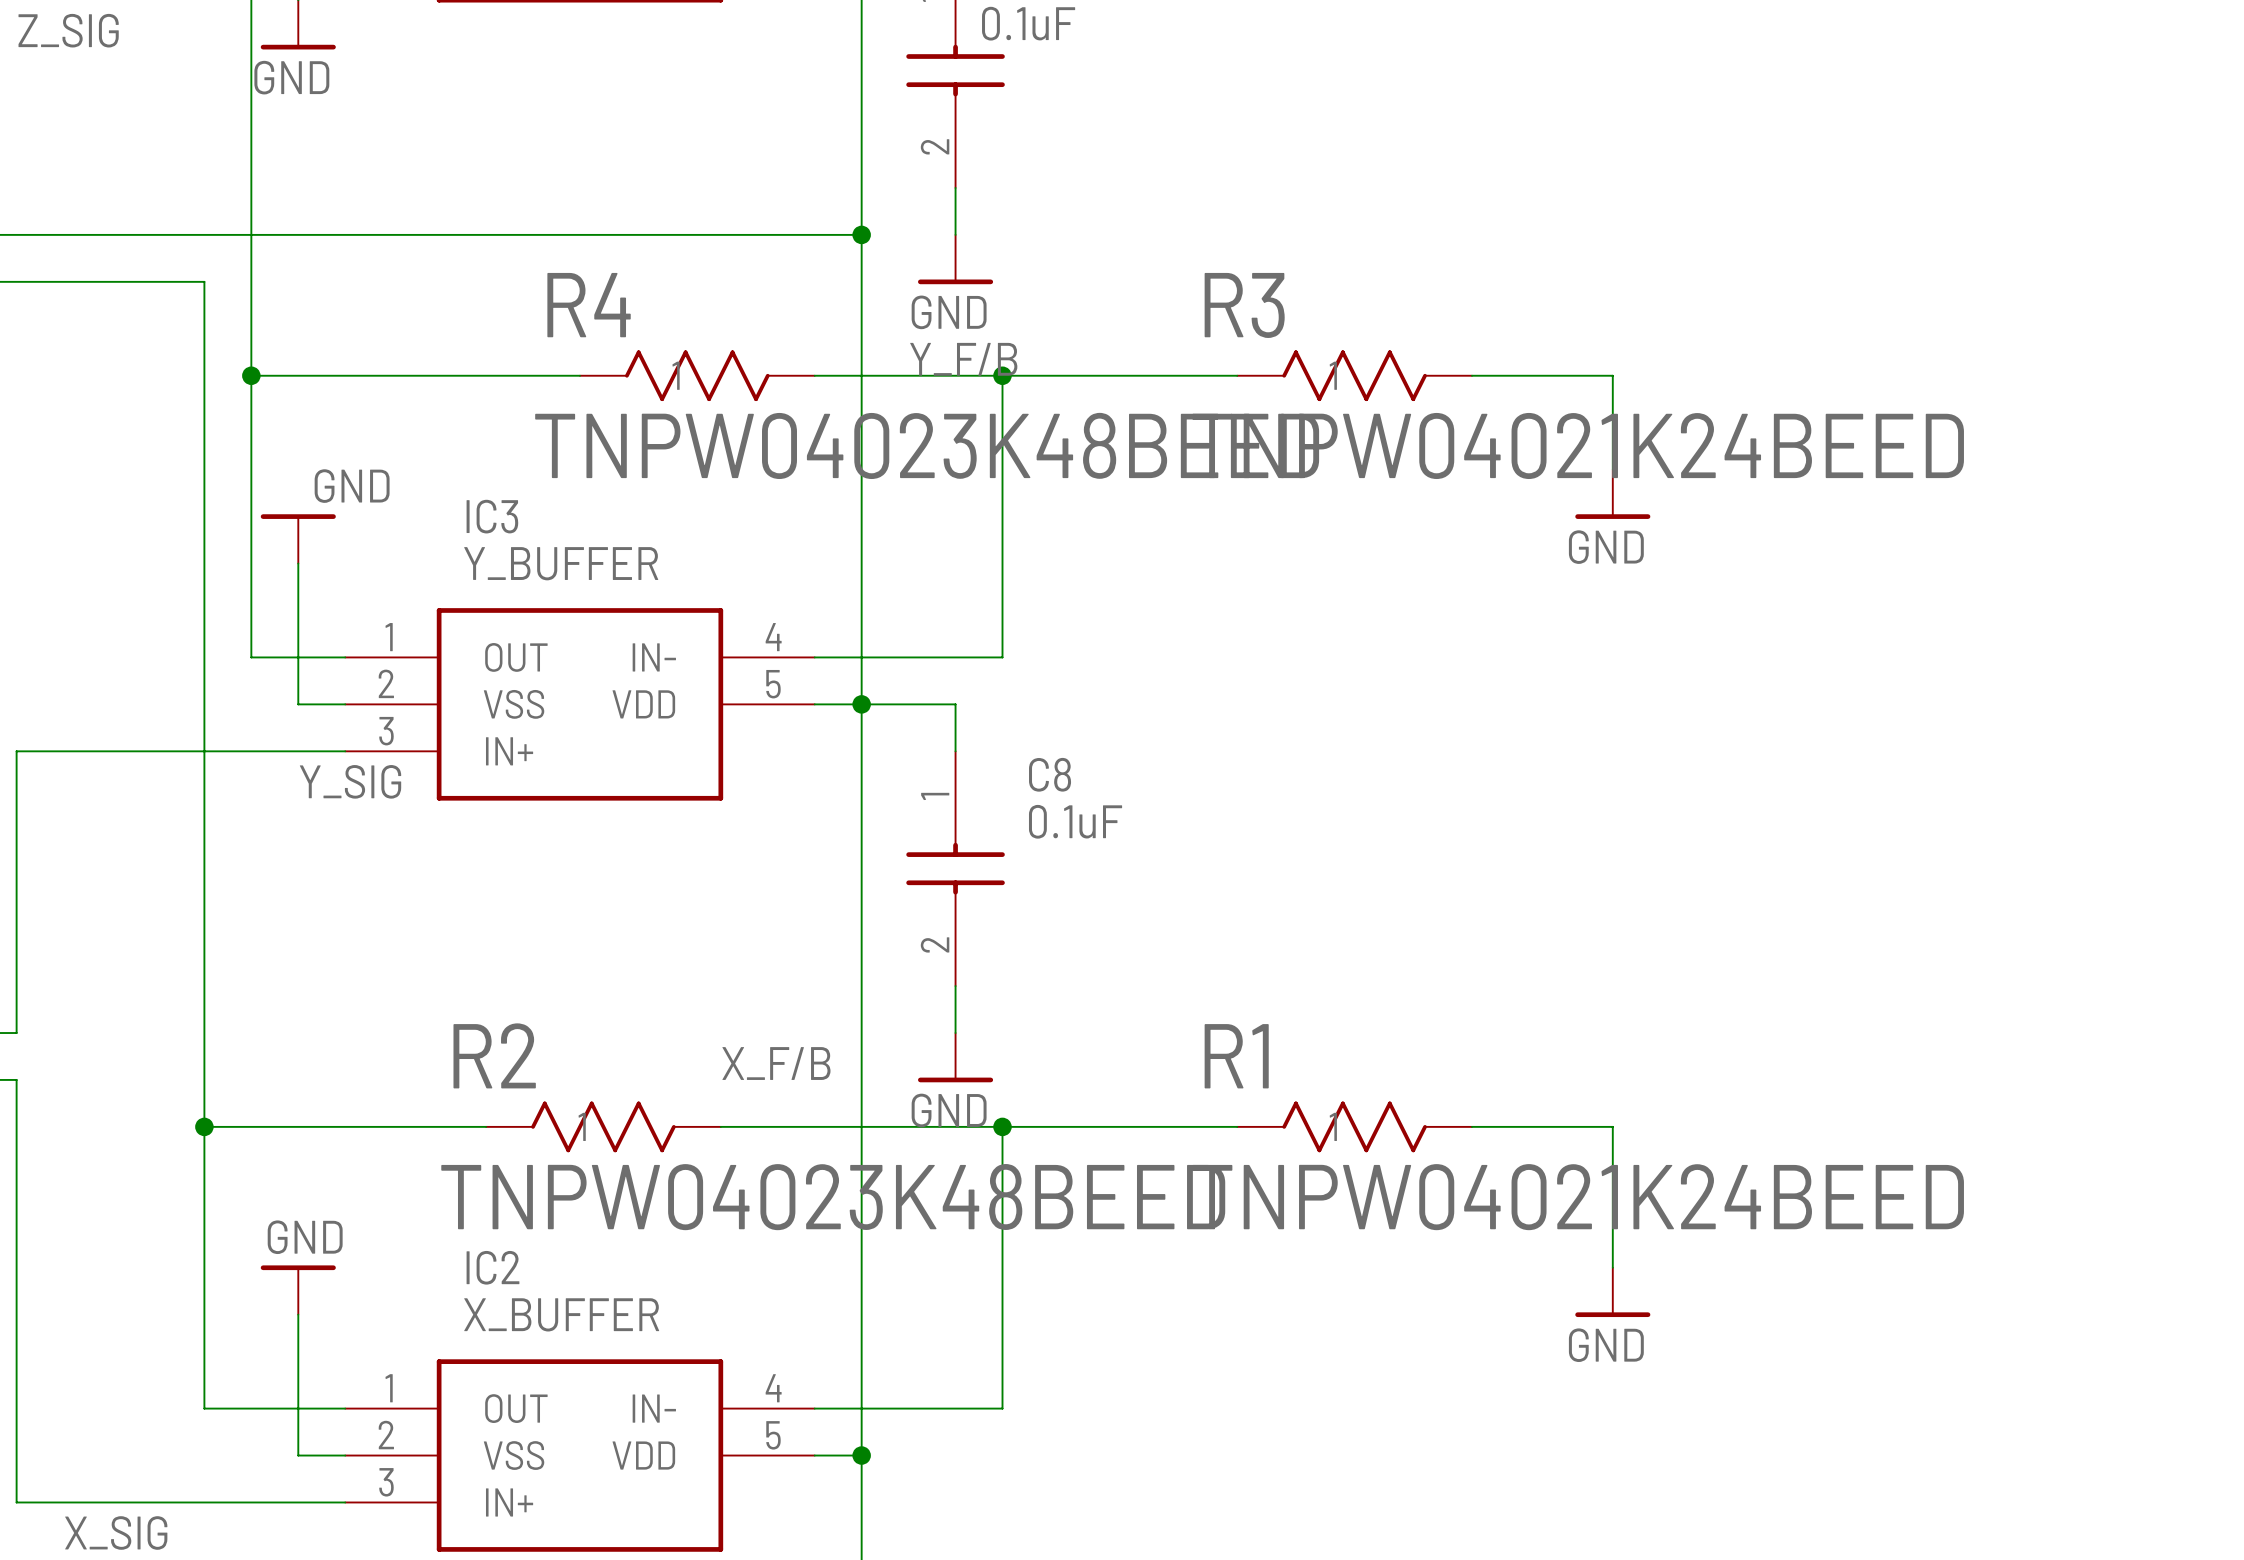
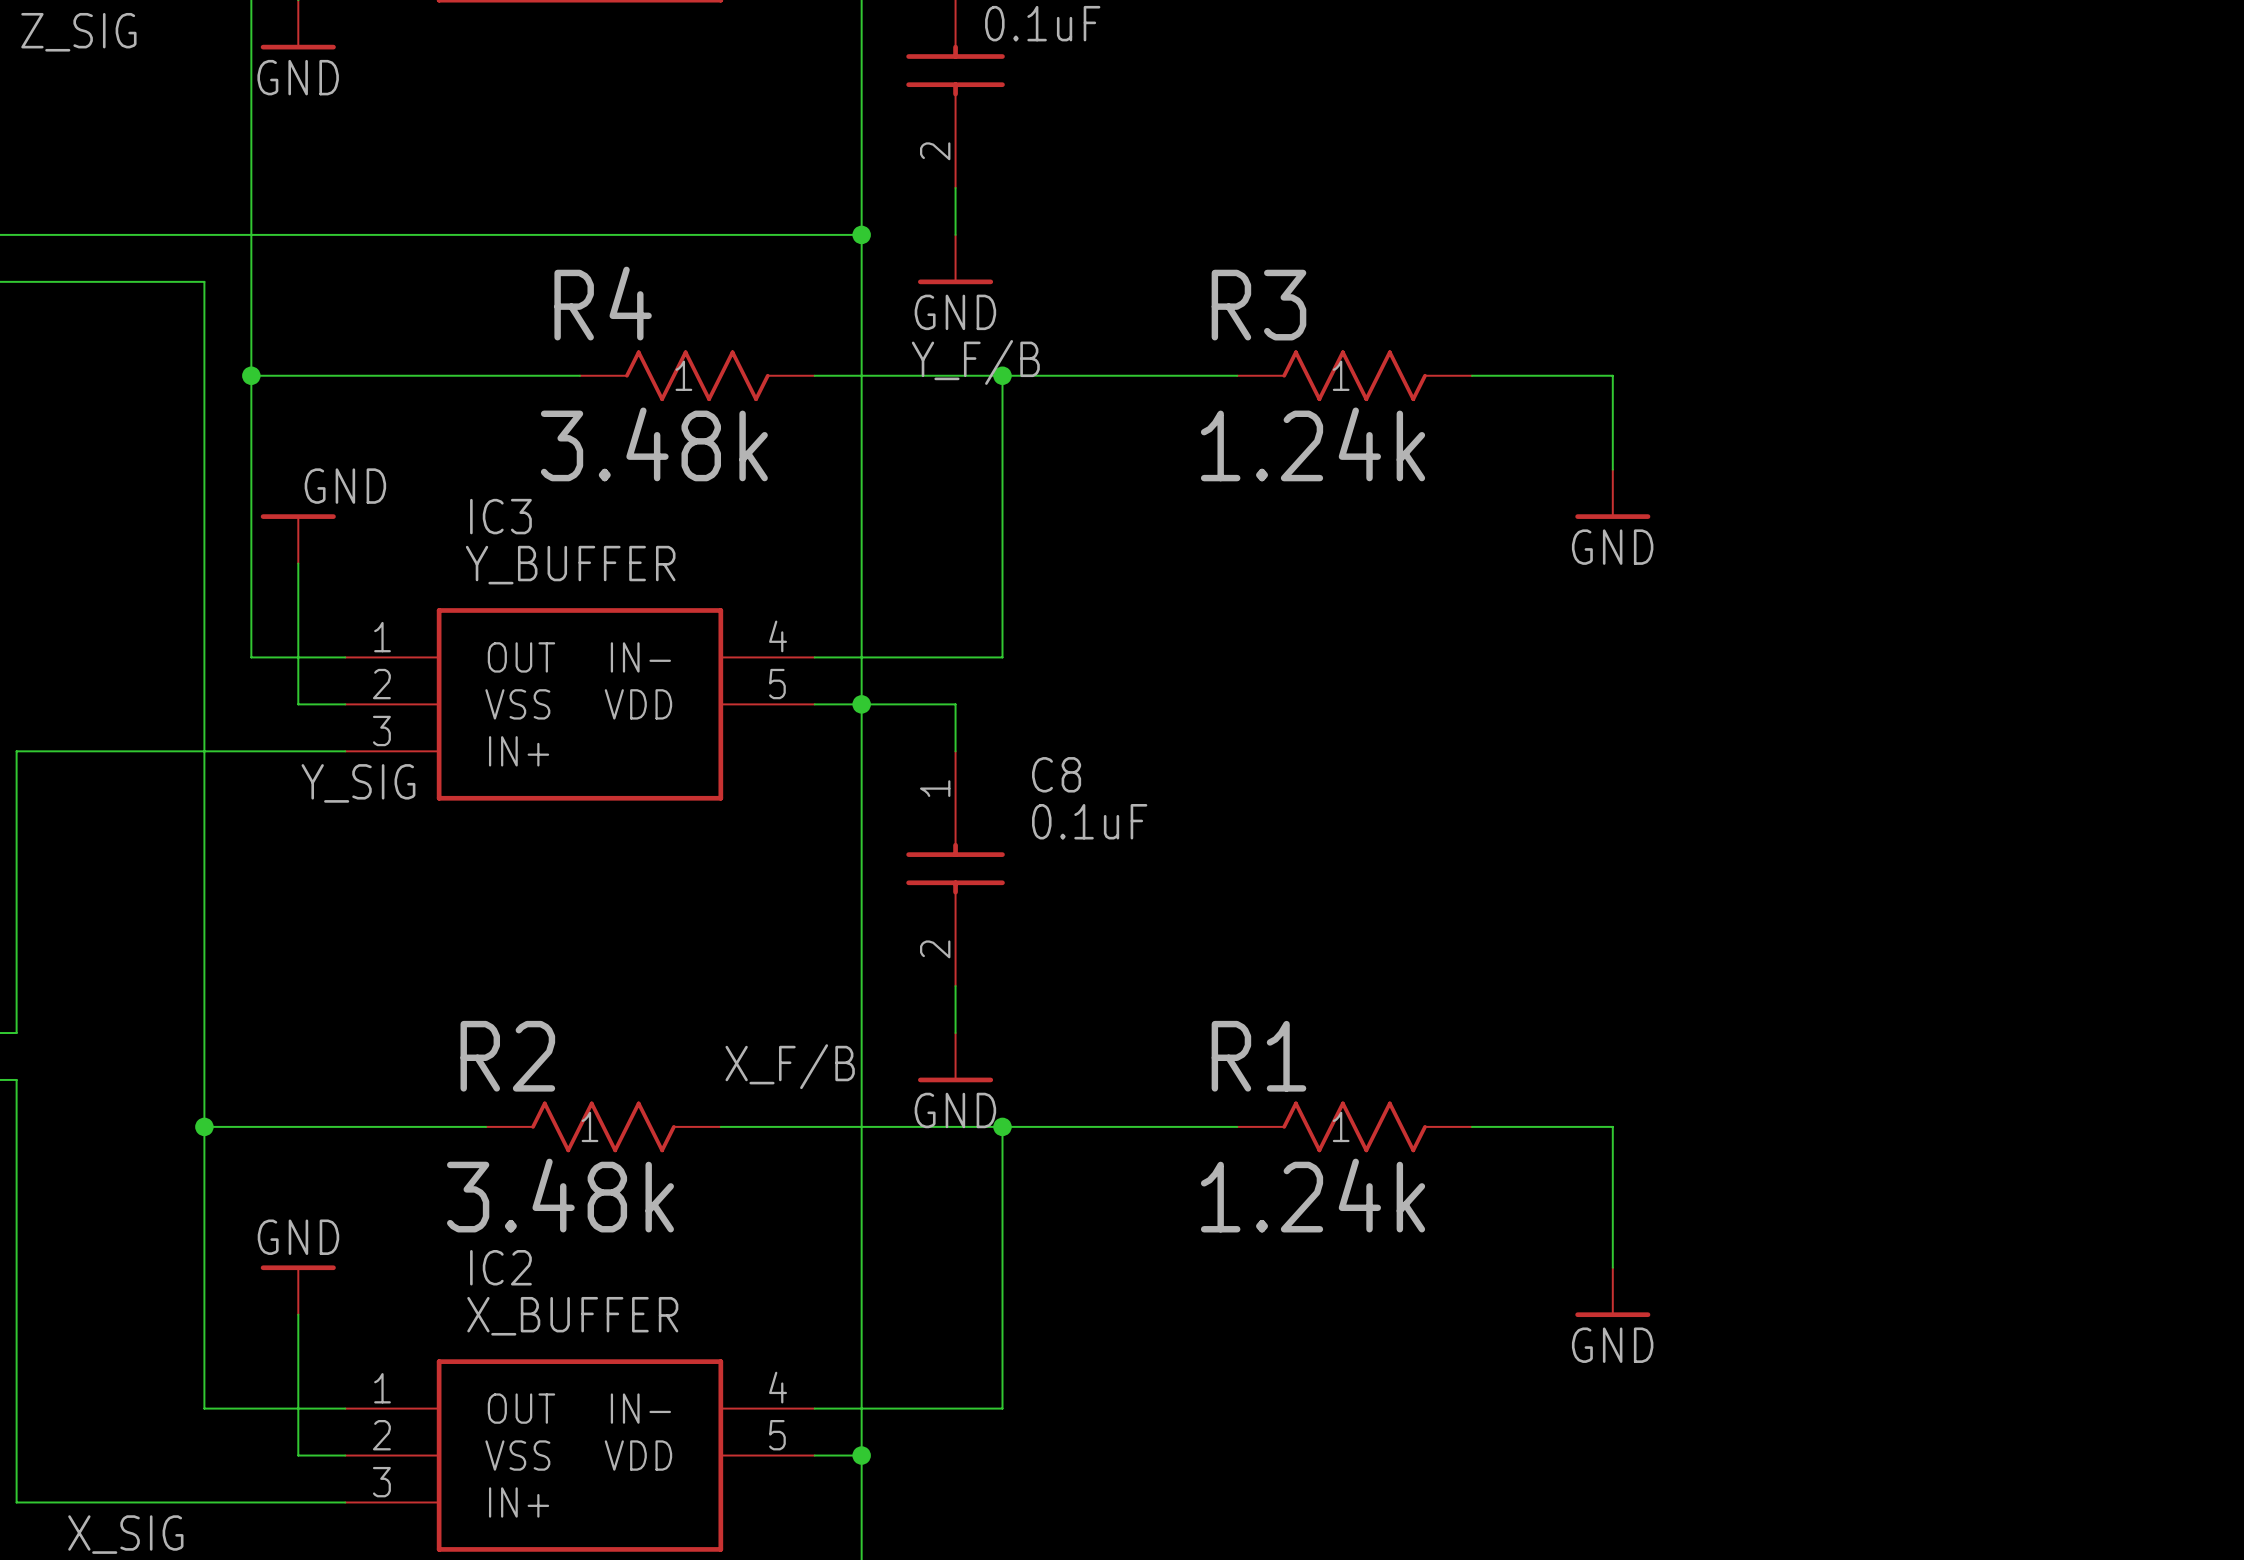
R4 value: TNPW04023K48BEED (927, 445) -> 3.48k (654, 444)
R3 value: TNPW04021K24BEED (1578, 445) -> 1.24k (1313, 444)
R2 value: TNPW04023K48BEED (833, 1197) -> 3.48k (560, 1195)
R1 value: TNPW04021K24BEED (1578, 1197) -> 1.24k (1313, 1195)

